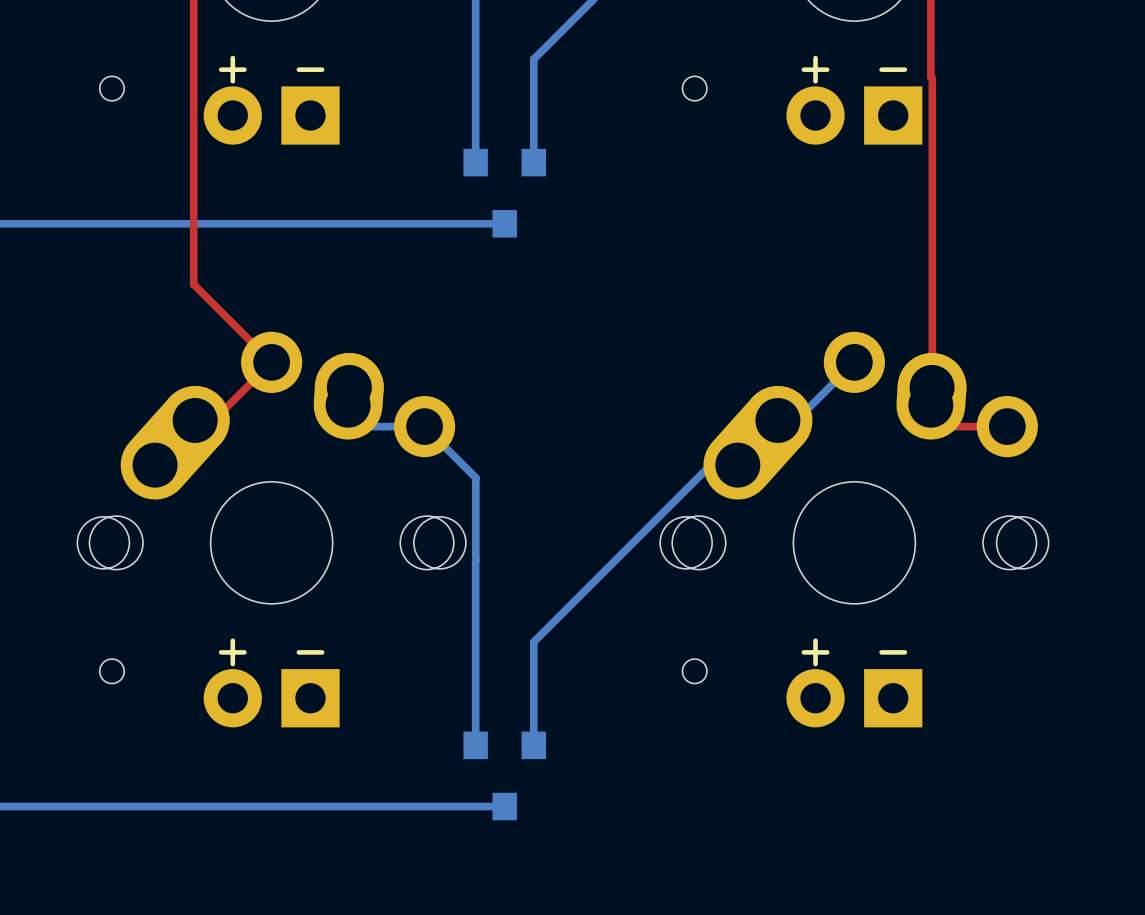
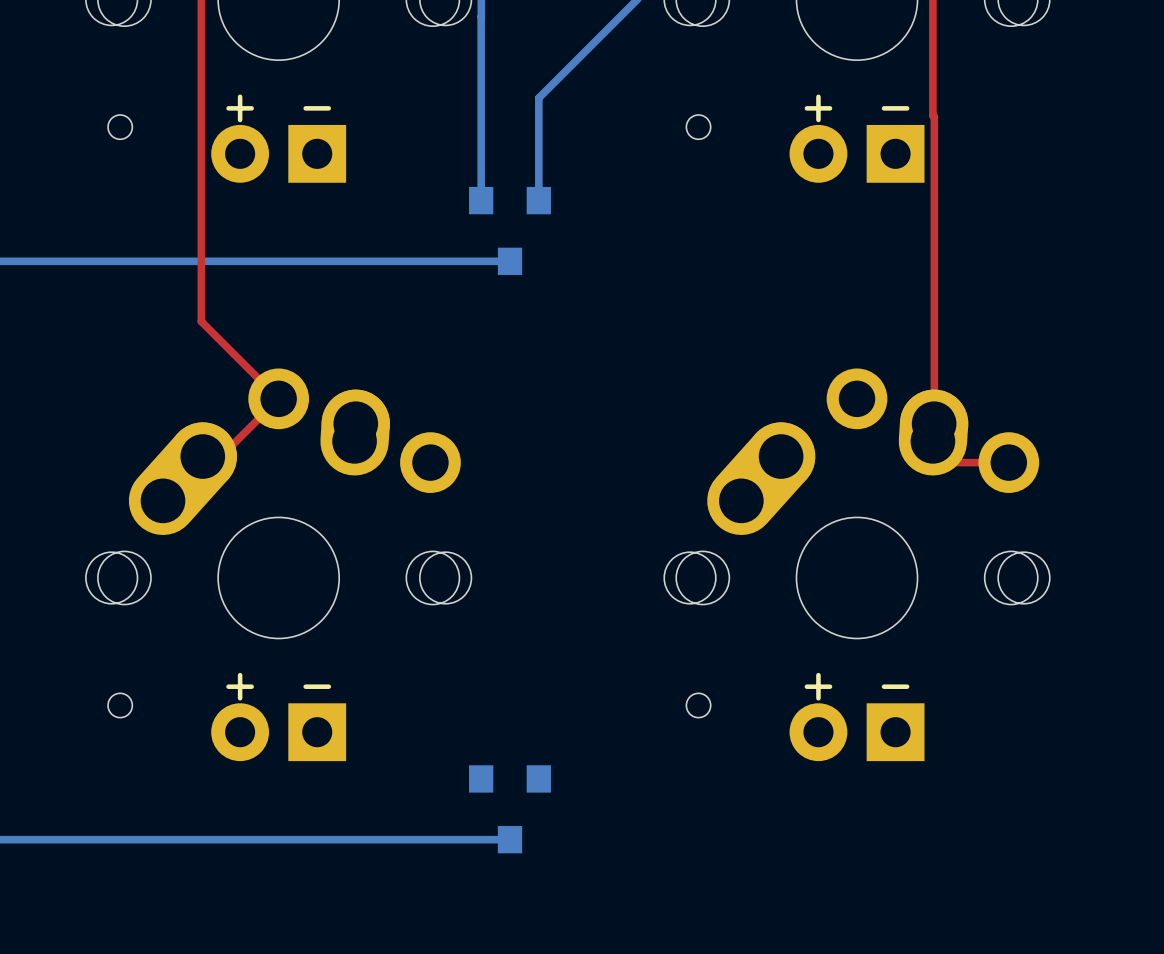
bottom track: (854, 362) (751, 465) (710, 465) (533, 641) (533, 745) -> none
bottom track: (348, 405) (369, 426) (424, 426) (475, 477) (475, 560) -> none
bottom track: (475, 560) (475, 745) -> none

